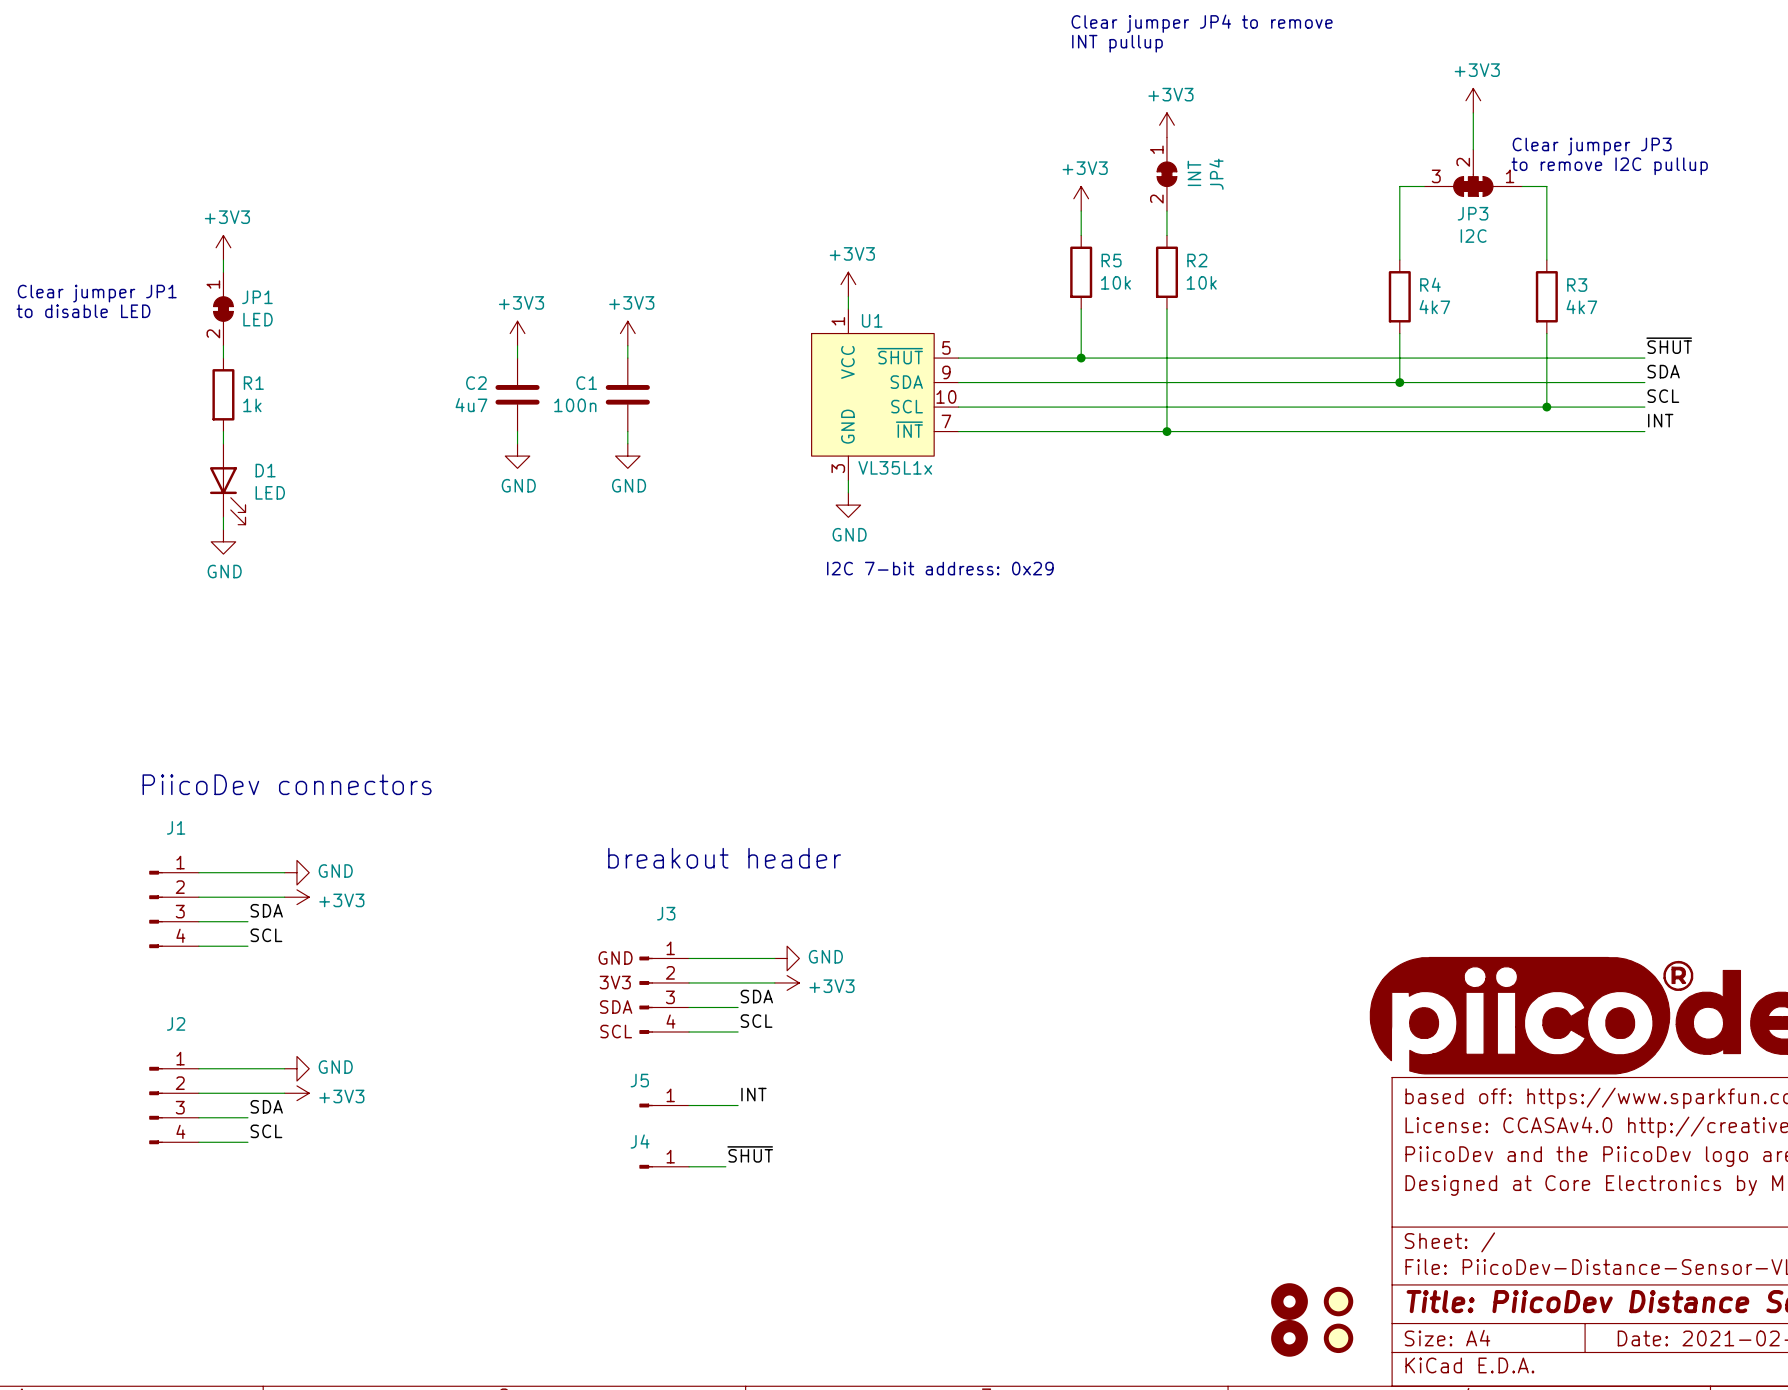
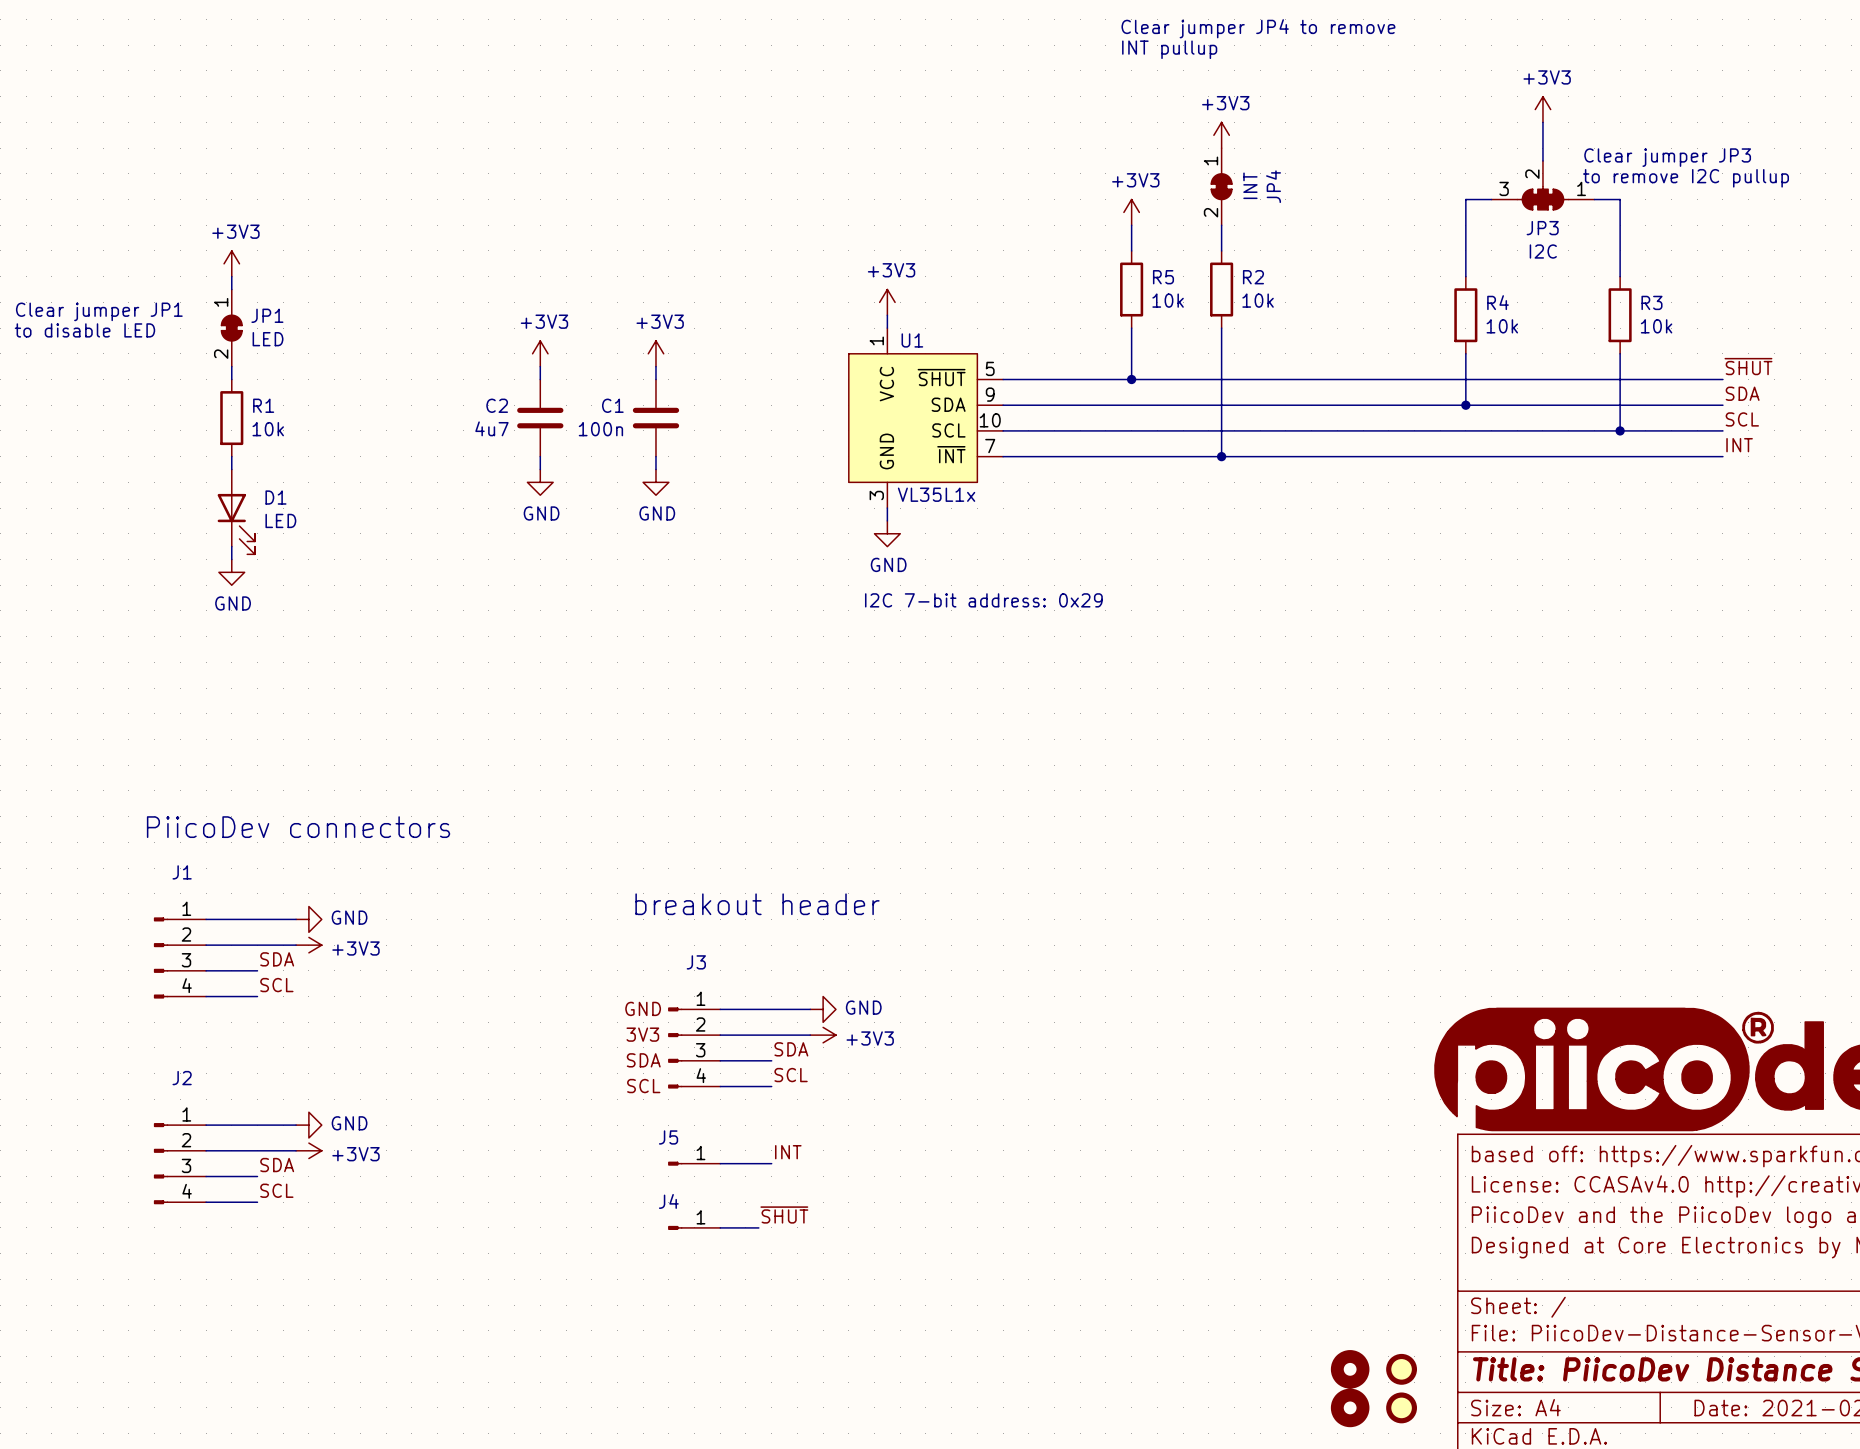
R4 value: 4k7 (1434, 307) -> 10k (1502, 326)
R3 value: 4k7 (1581, 307) -> 10k (1656, 326)
R1 value: 1k (252, 405) -> 10k (268, 429)

